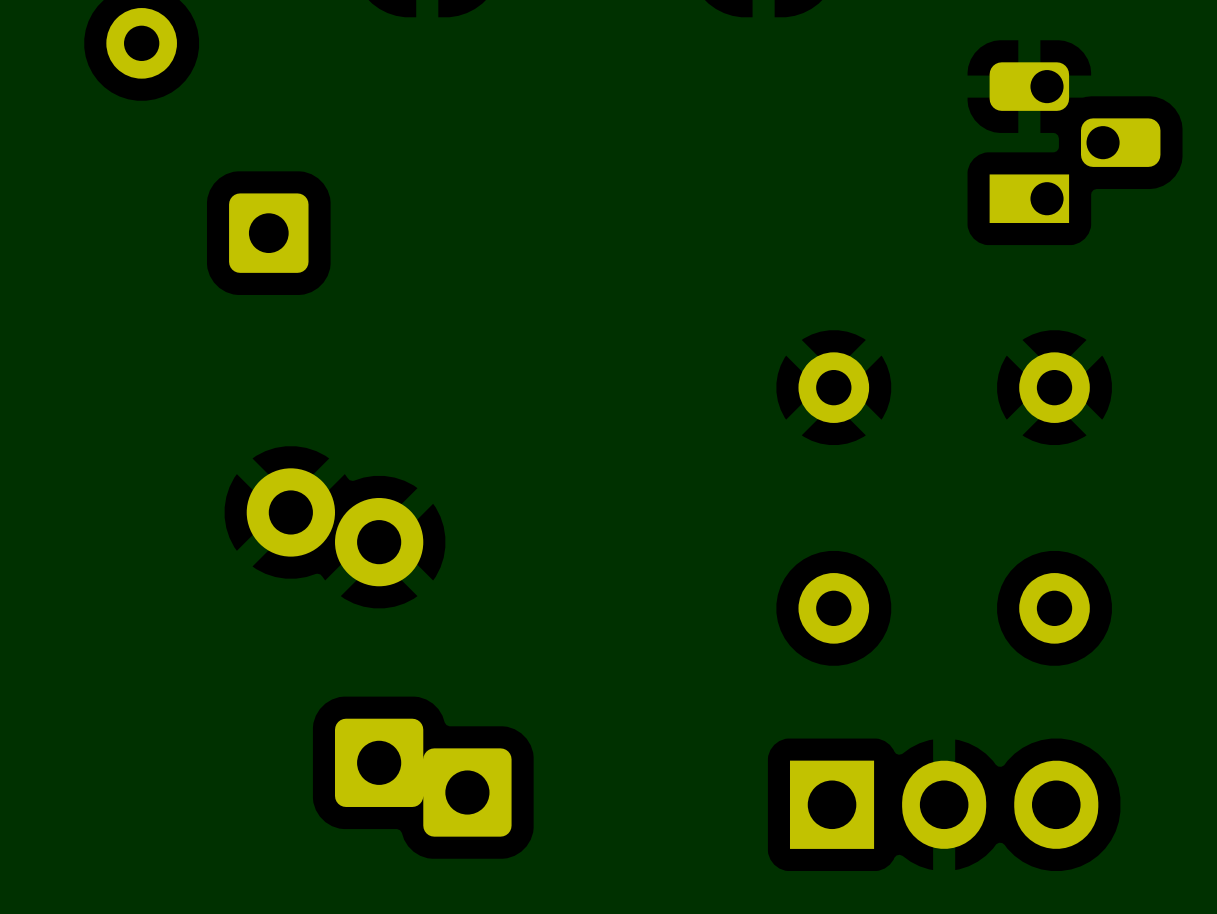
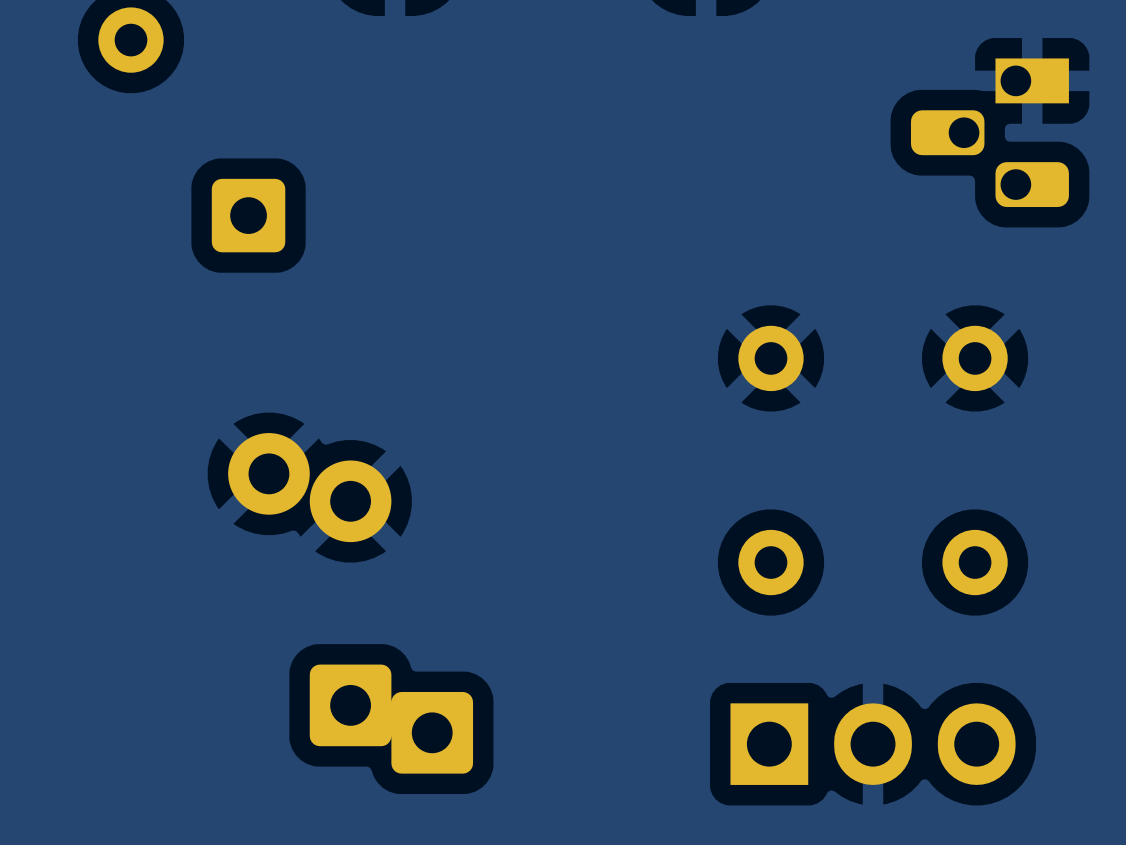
part rotation: 0° (1075, 142) -> 180° (989, 132)

